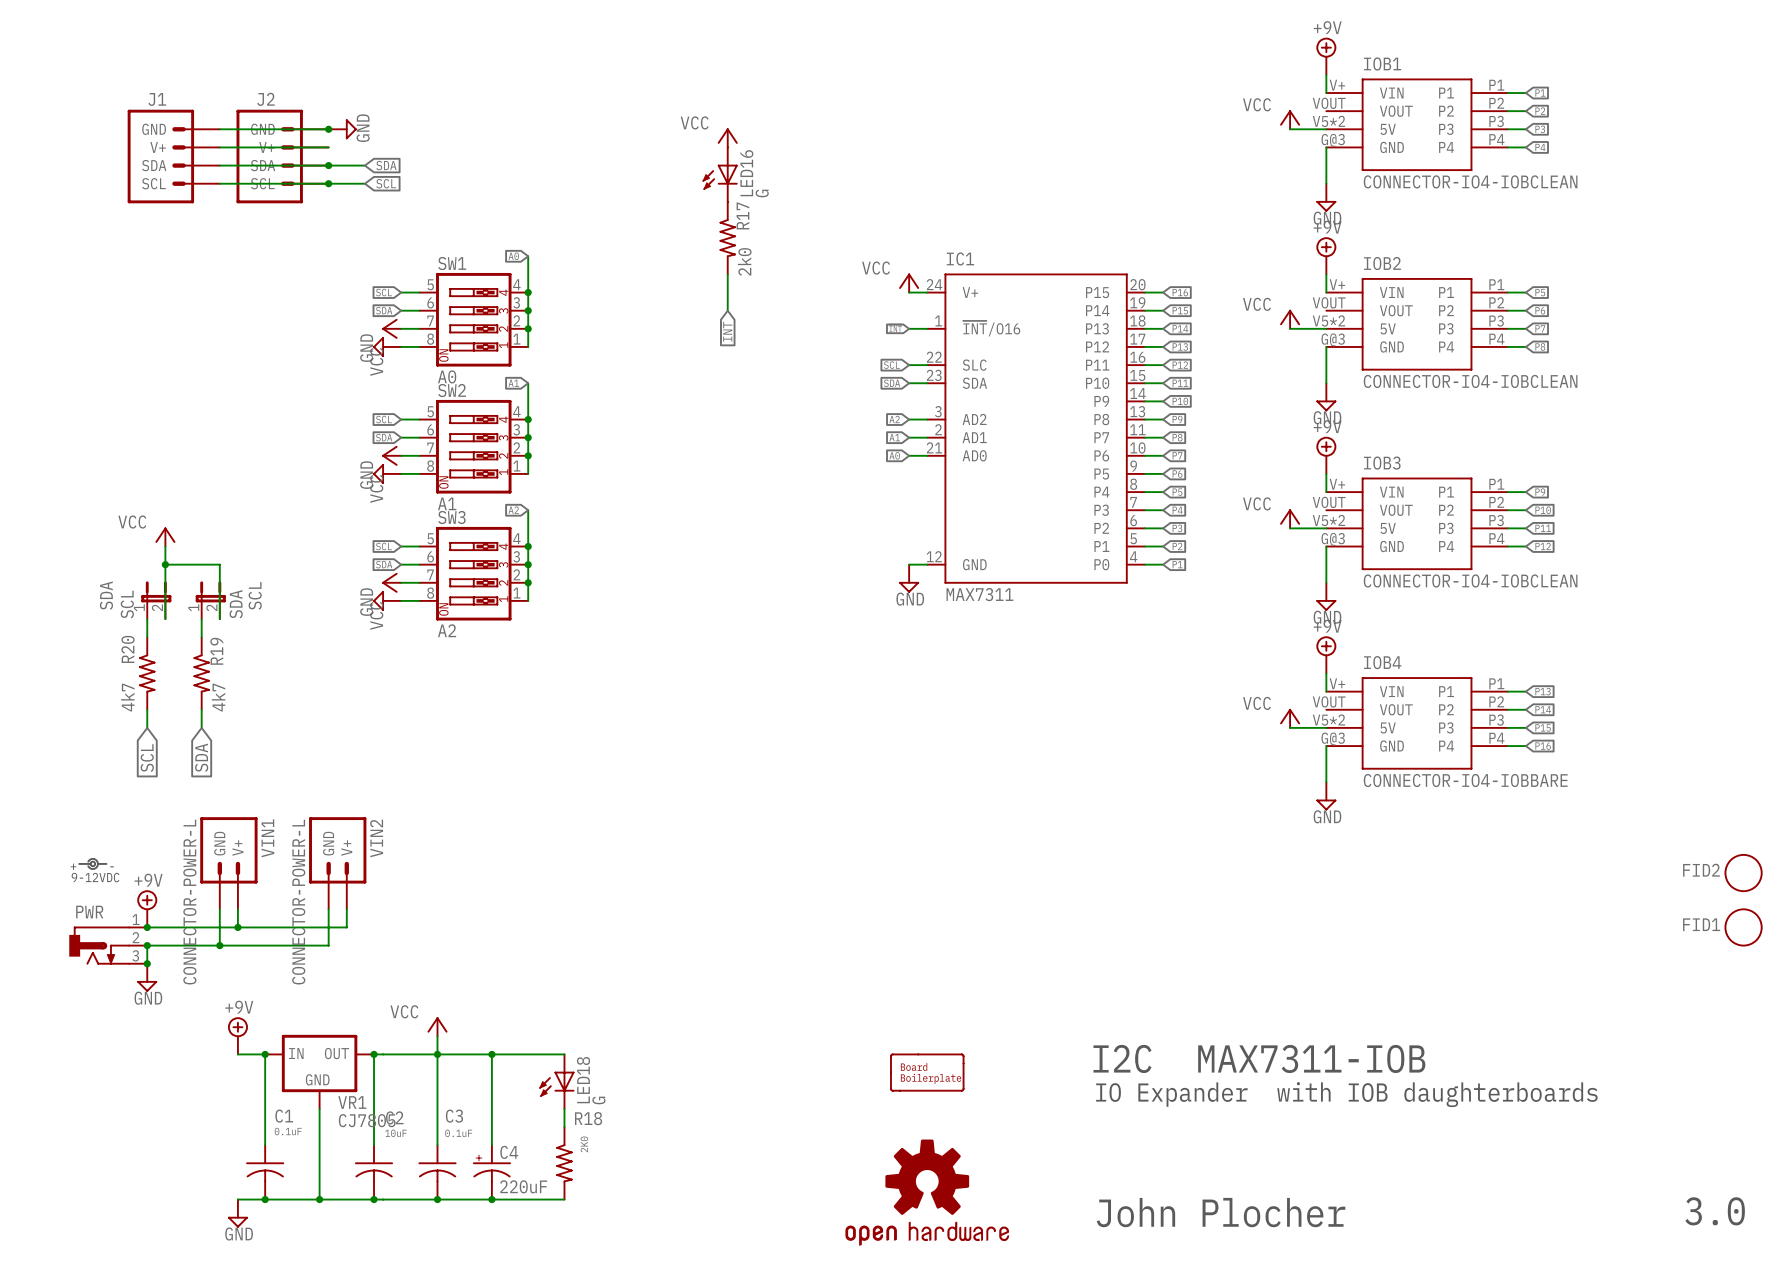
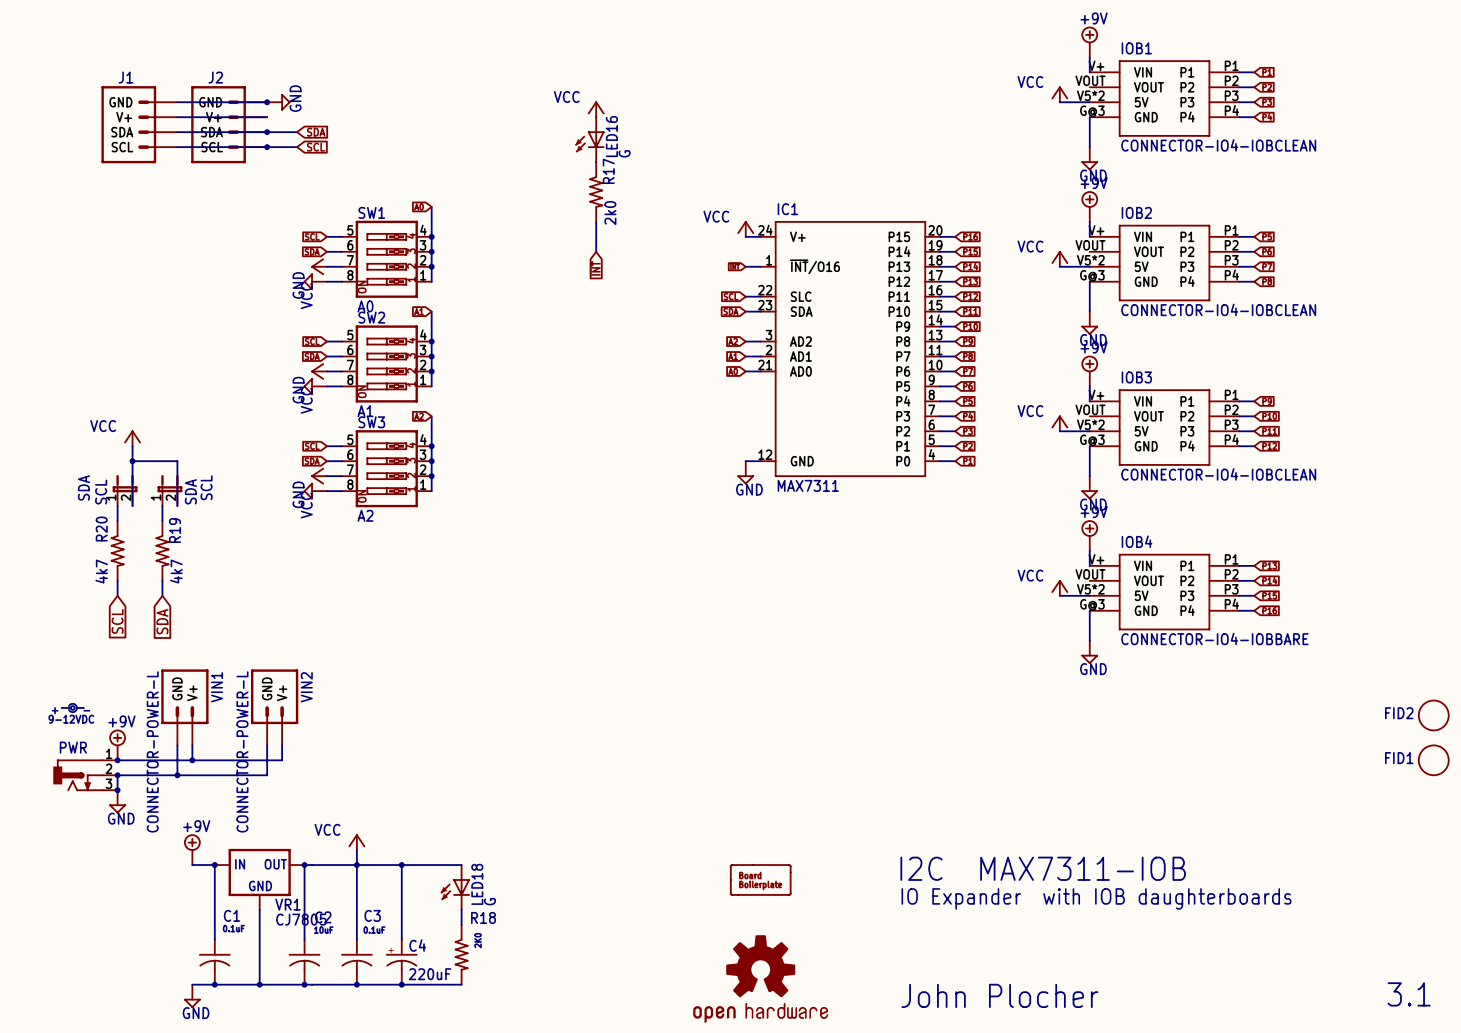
text: 3.0 (1715, 1211) -> 3.1 (1409, 994)

